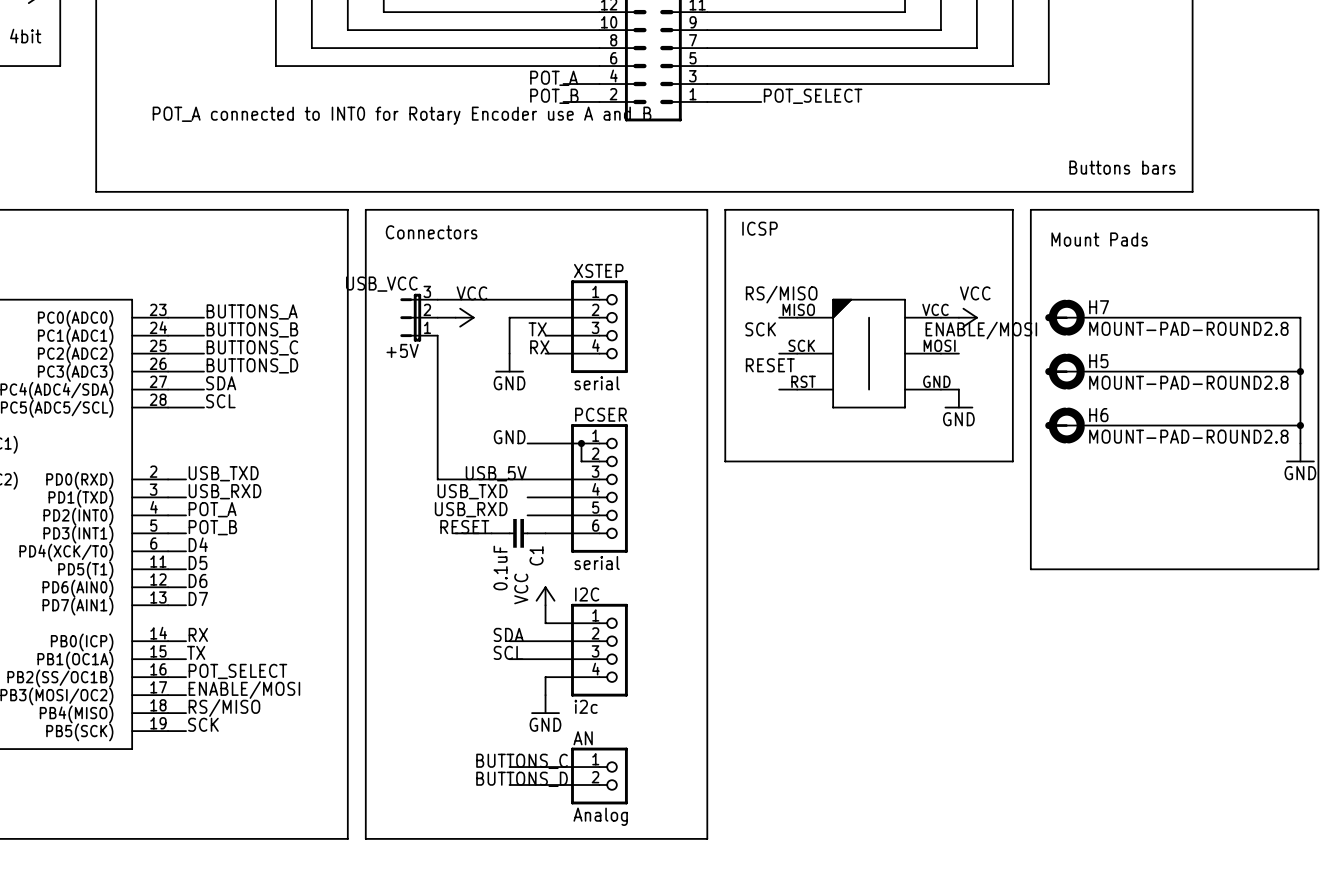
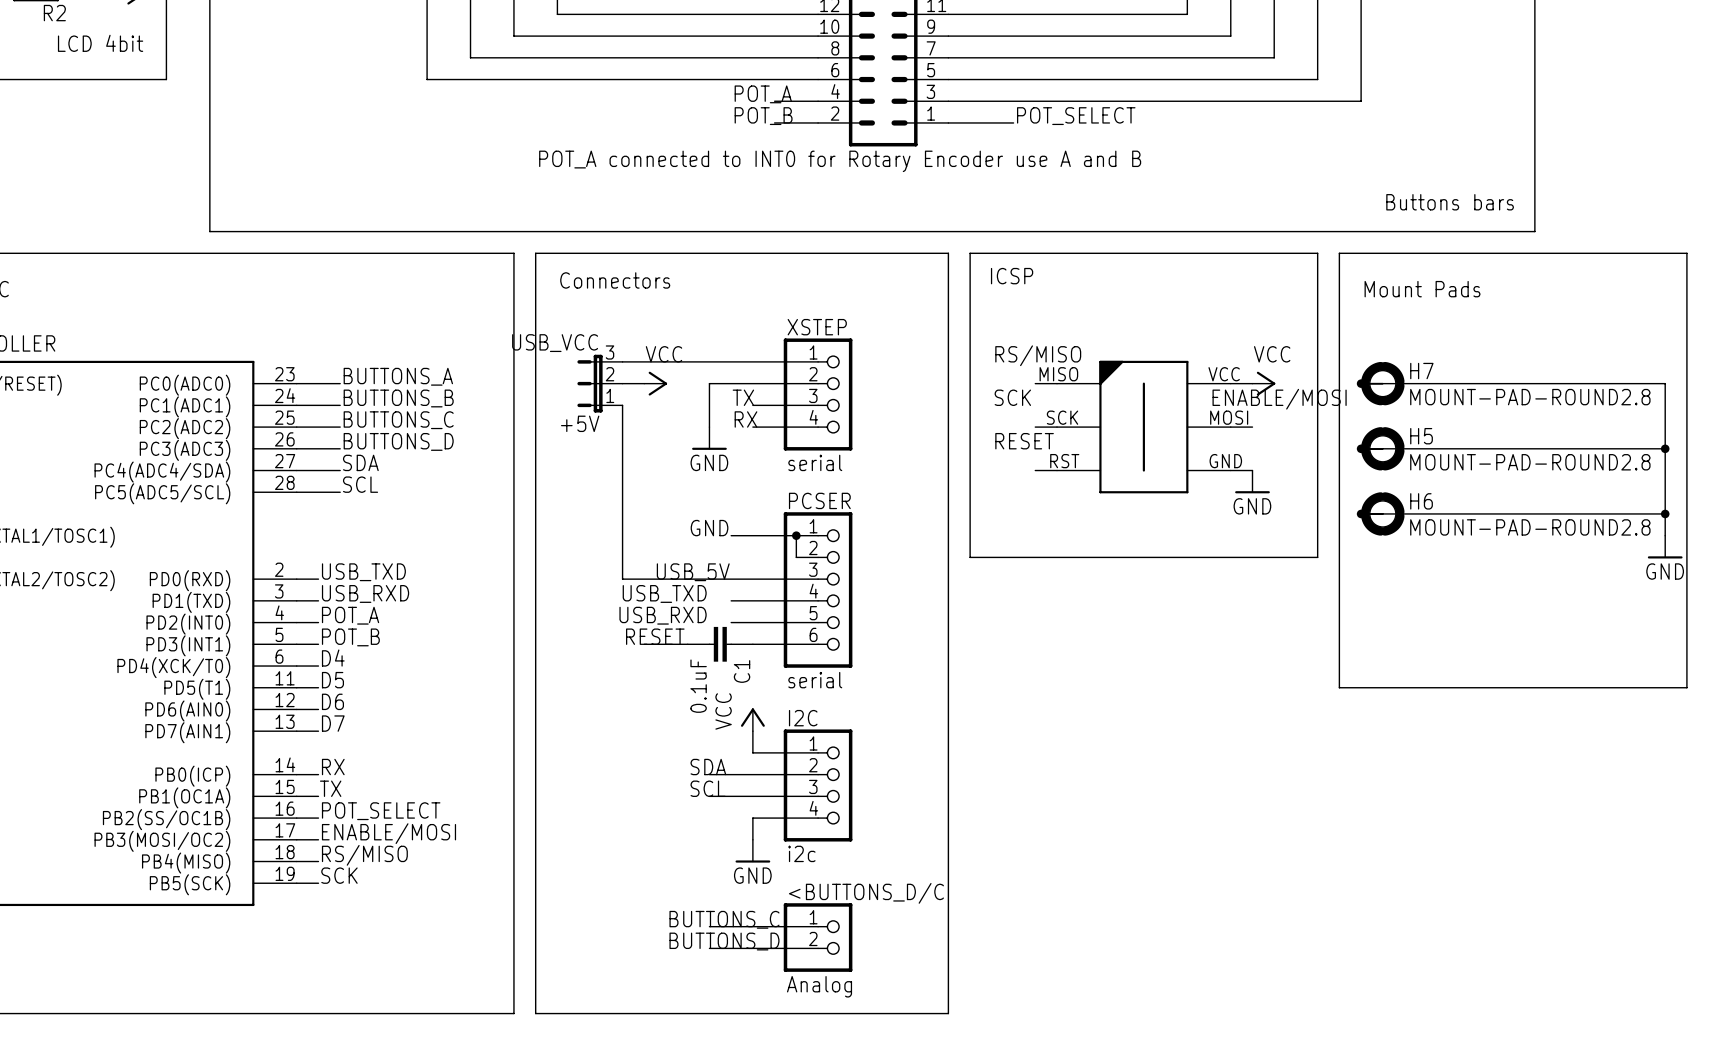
text: POT_A connected to INT0 for Rotary Encoder use A and B (402, 115) -> none
text: none -> POT_A connected to INT0 for Rotary Encoder use A and B (840, 161)
AN name: AN (583, 738) -> <BUTTONS_D/C (866, 893)

